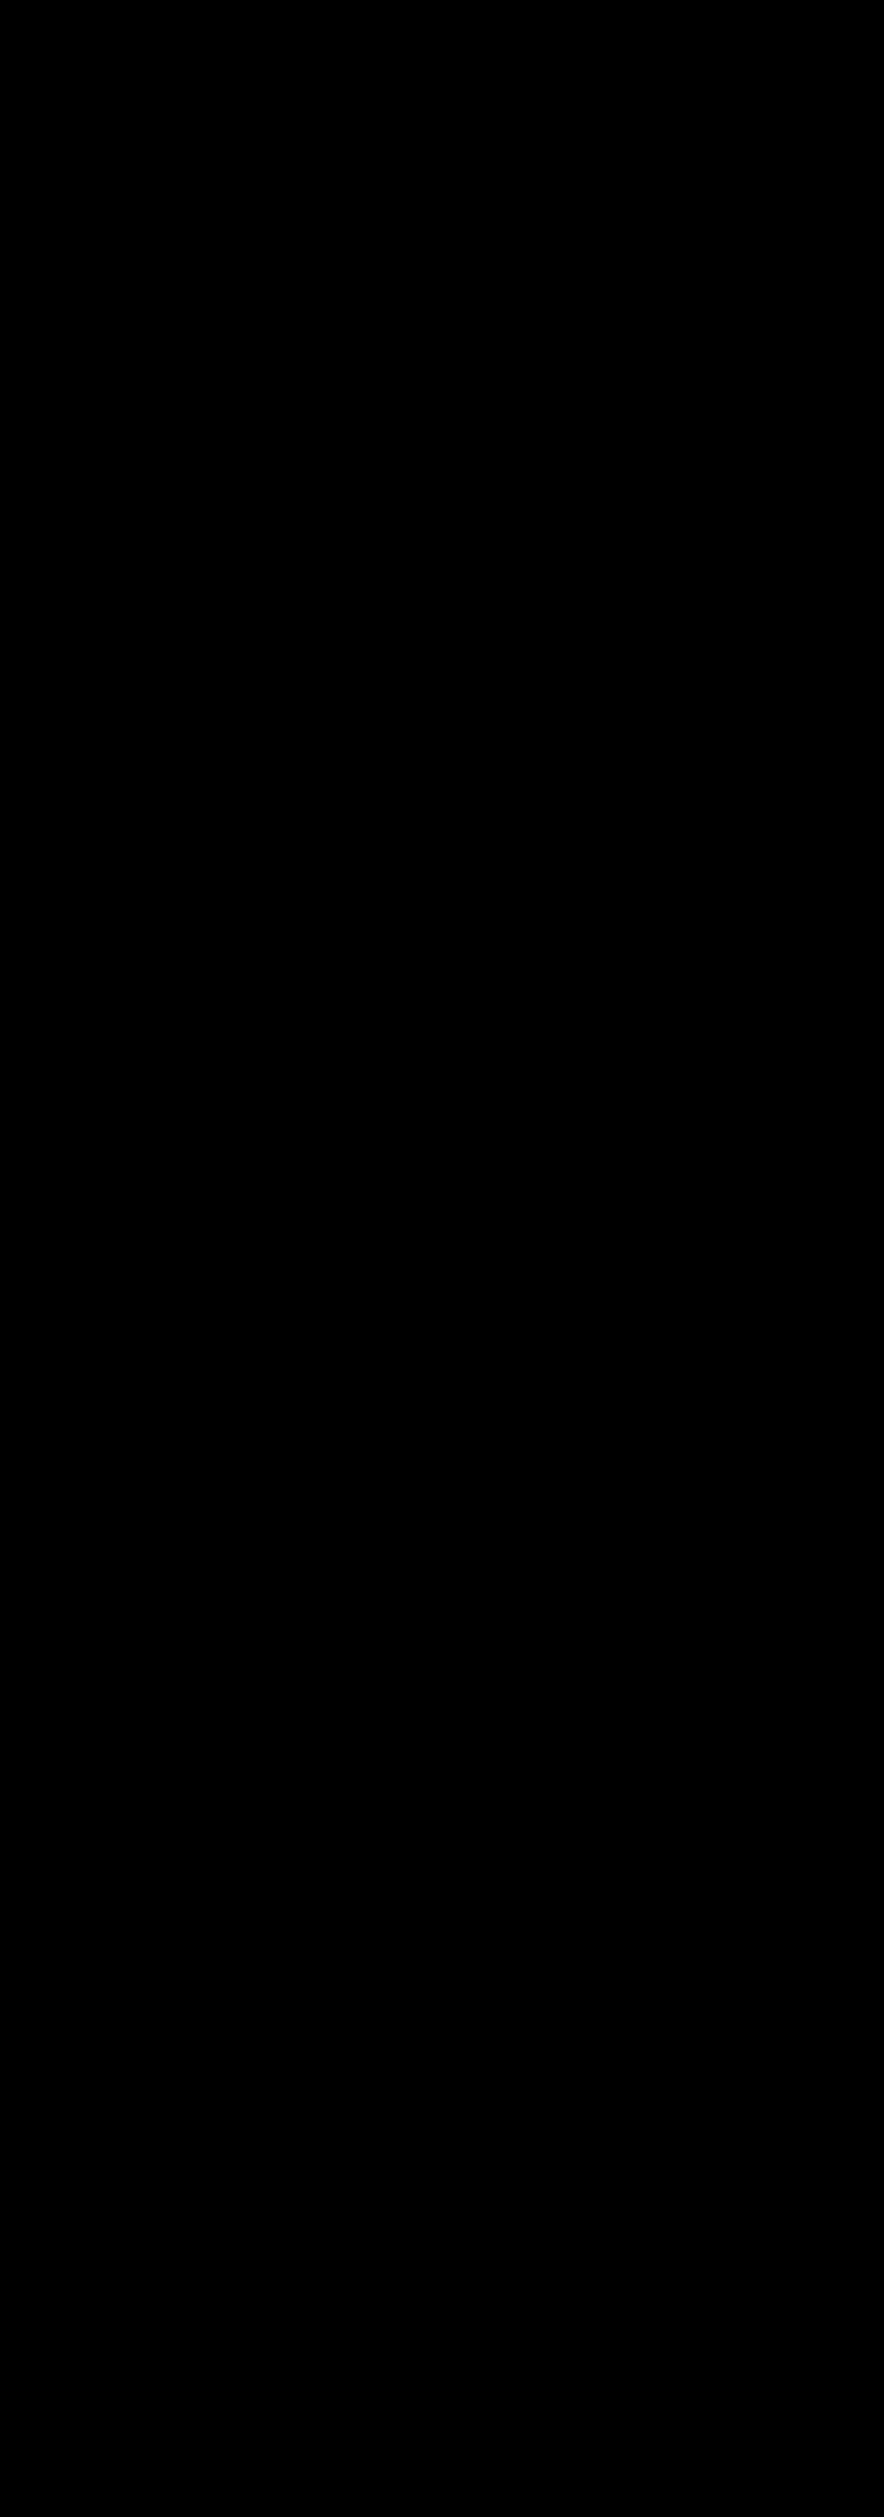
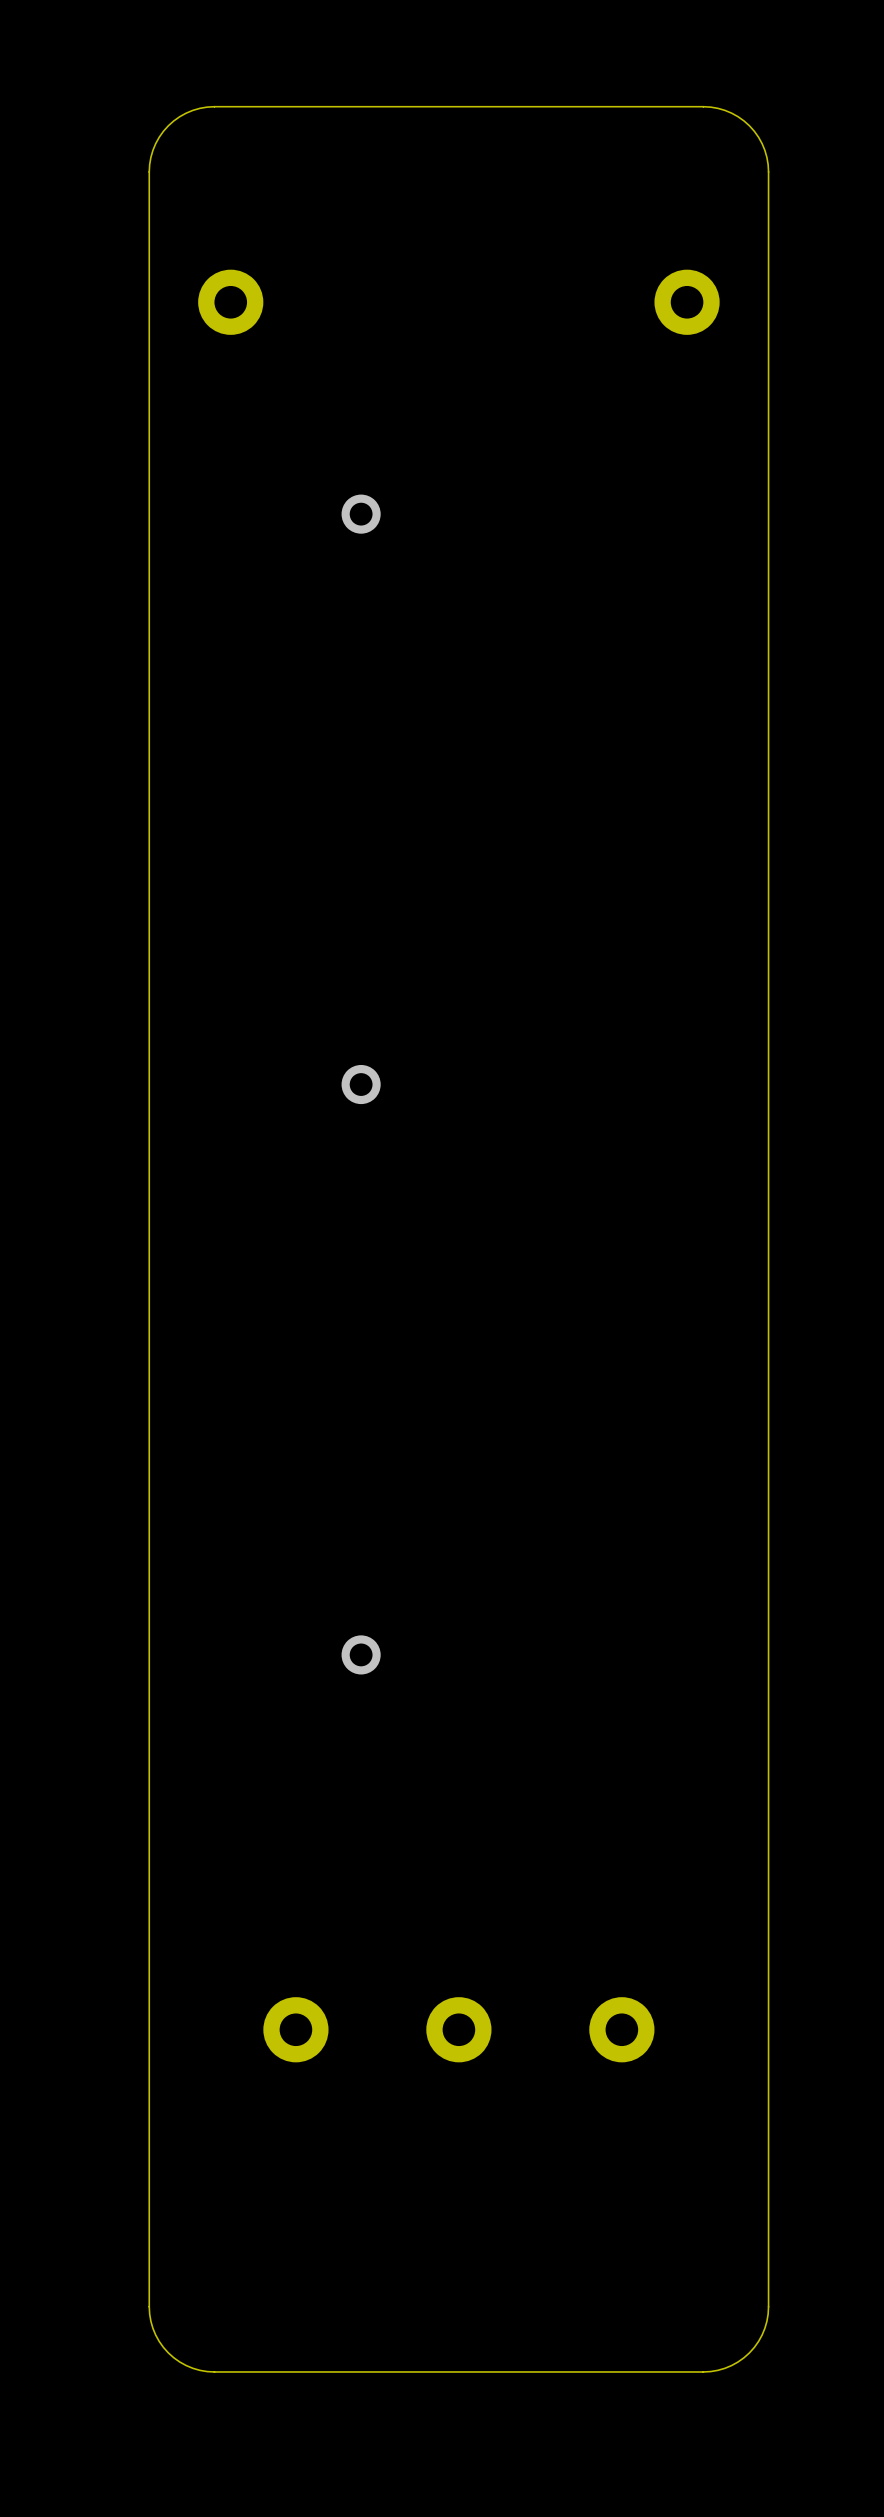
board edge: none -> (703, 106) (207, 107) (186, 113) (173, 120) (159, 137) (150, 157) (149, 171) (149, 2306) (152, 2328) (163, 2347) (179, 2362) (199, 2370) (214, 2371) (710, 2371) (731, 2365) (744, 2357) (758, 2341) (766, 2321) (768, 2306) (768, 171) (764, 150) (758, 137) (749, 125) (738, 116) (724, 110) (703, 106)
part: none -> (230, 302)
part: none -> (687, 302)
via: none -> (361, 514)
via: none -> (361, 1084)
via: none -> (361, 1654)
part: none -> (295, 2029)
part: none -> (458, 2029)
part: none -> (621, 2029)

